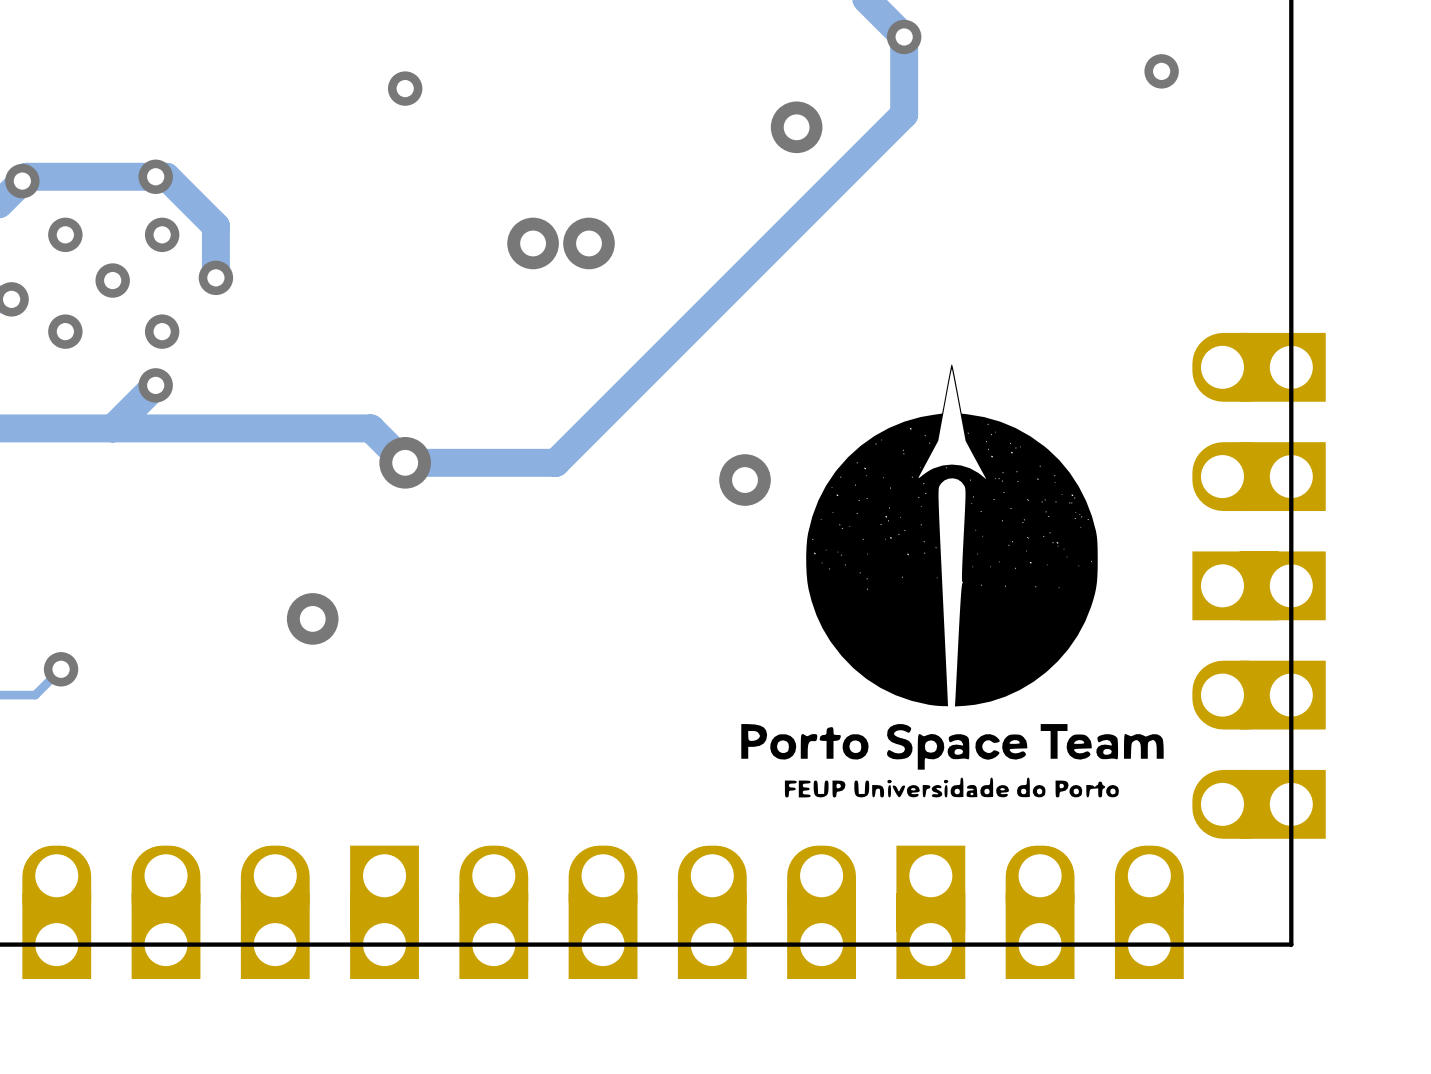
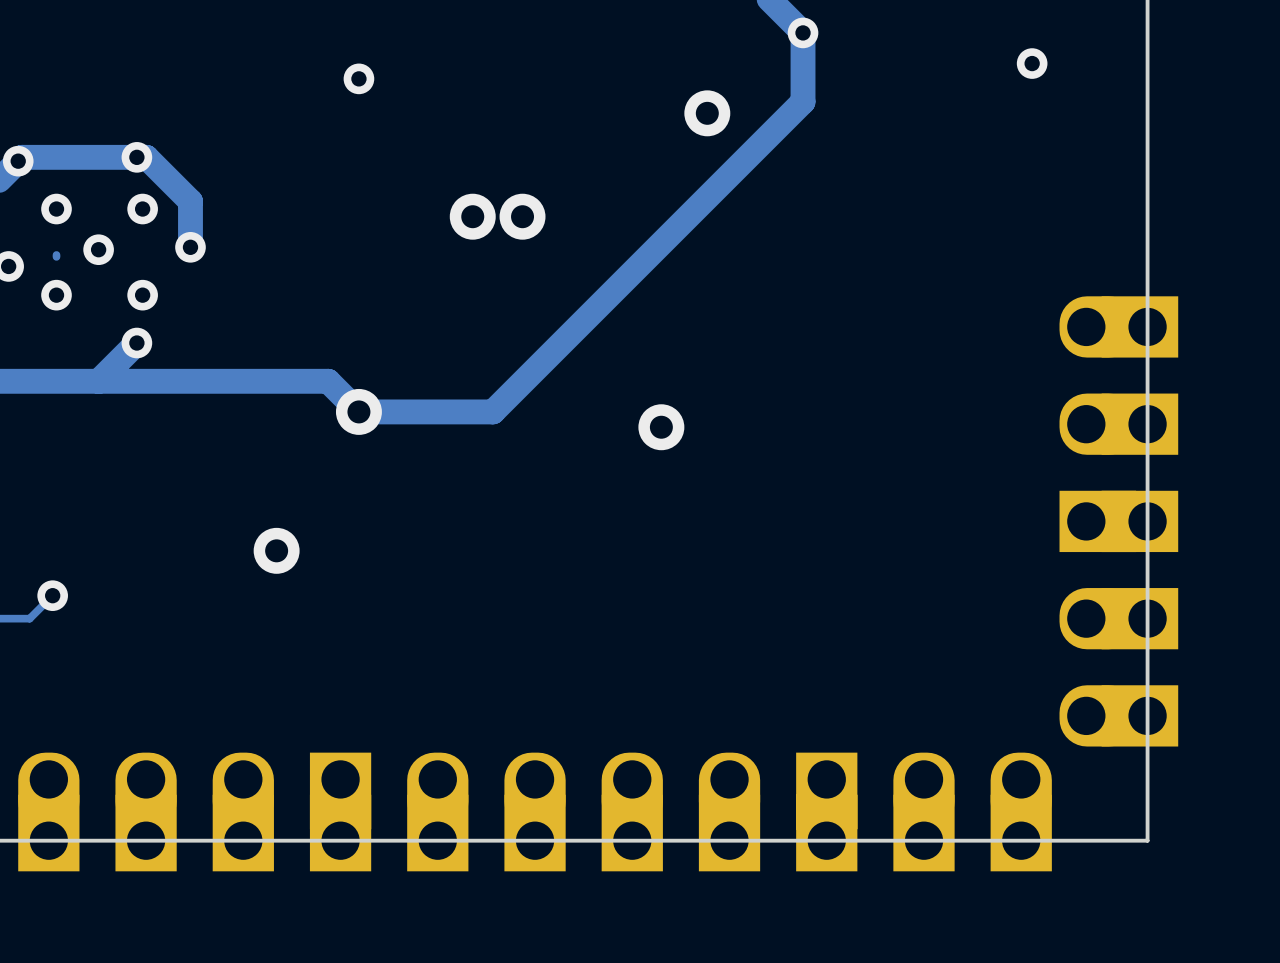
track: none -> (56, 254) (56, 256)
drawing: [741, 364, 1164, 798] -> none

